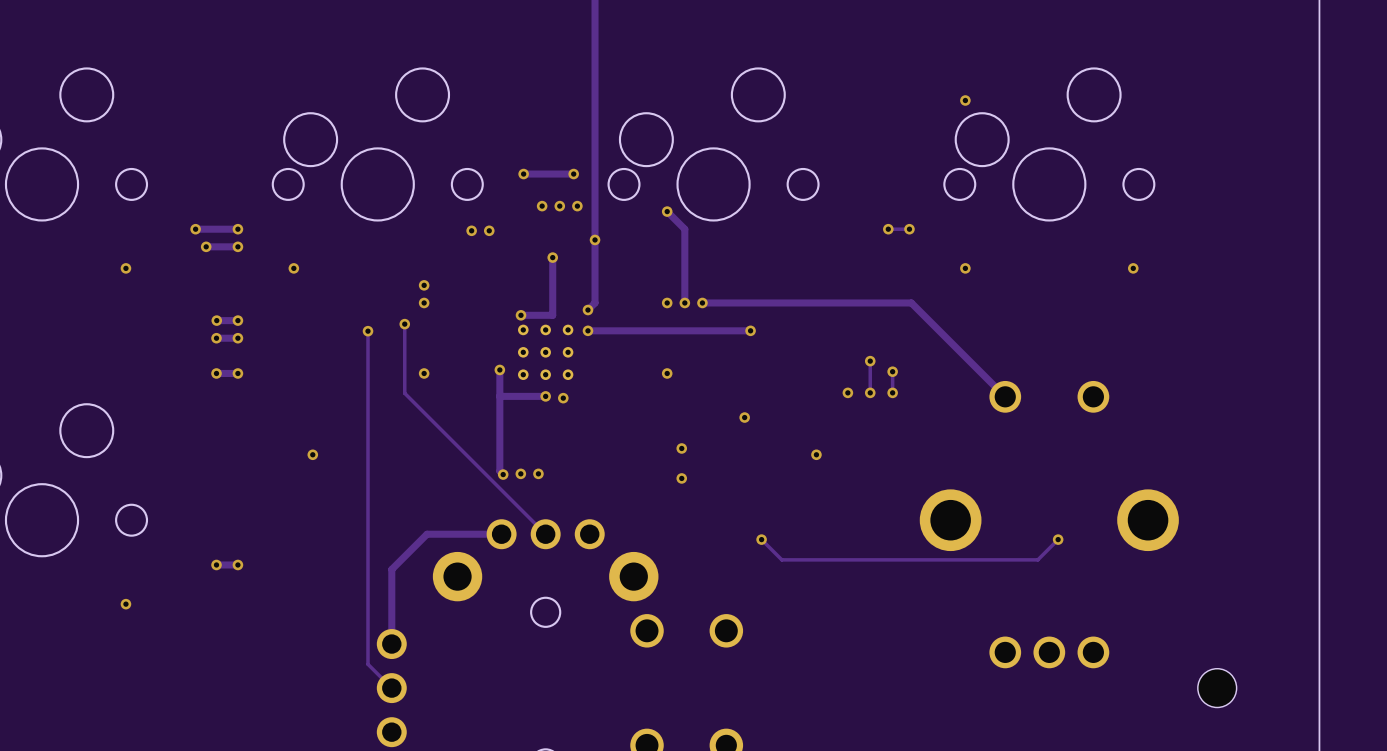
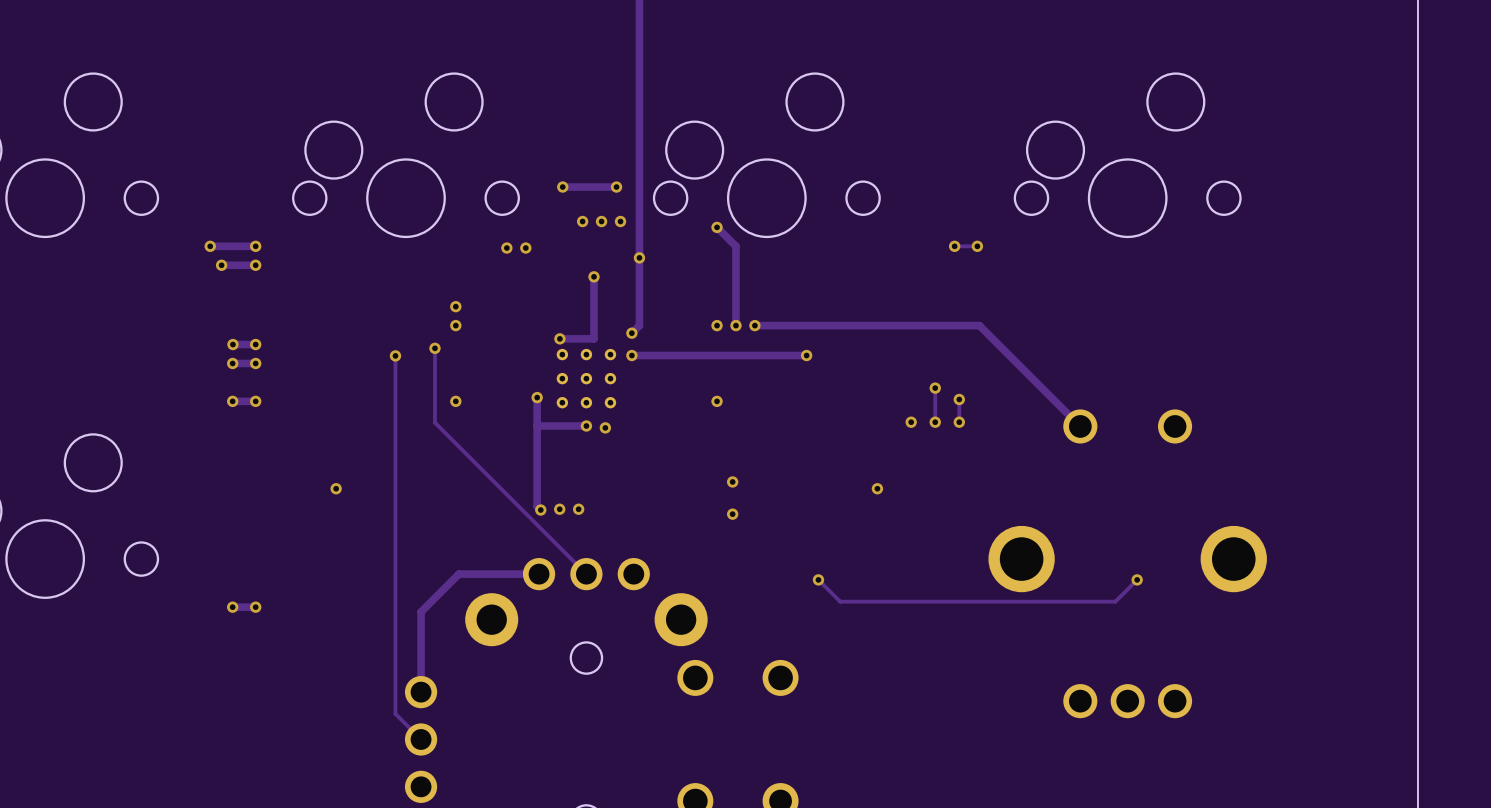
via: (965, 100) -> none
via: (125, 268) -> none
via: (293, 268) -> none
via: (965, 268) -> none
via: (1133, 268) -> none
via: (744, 417) -> none
via: (125, 604) -> none
part: (1217, 688) -> none

